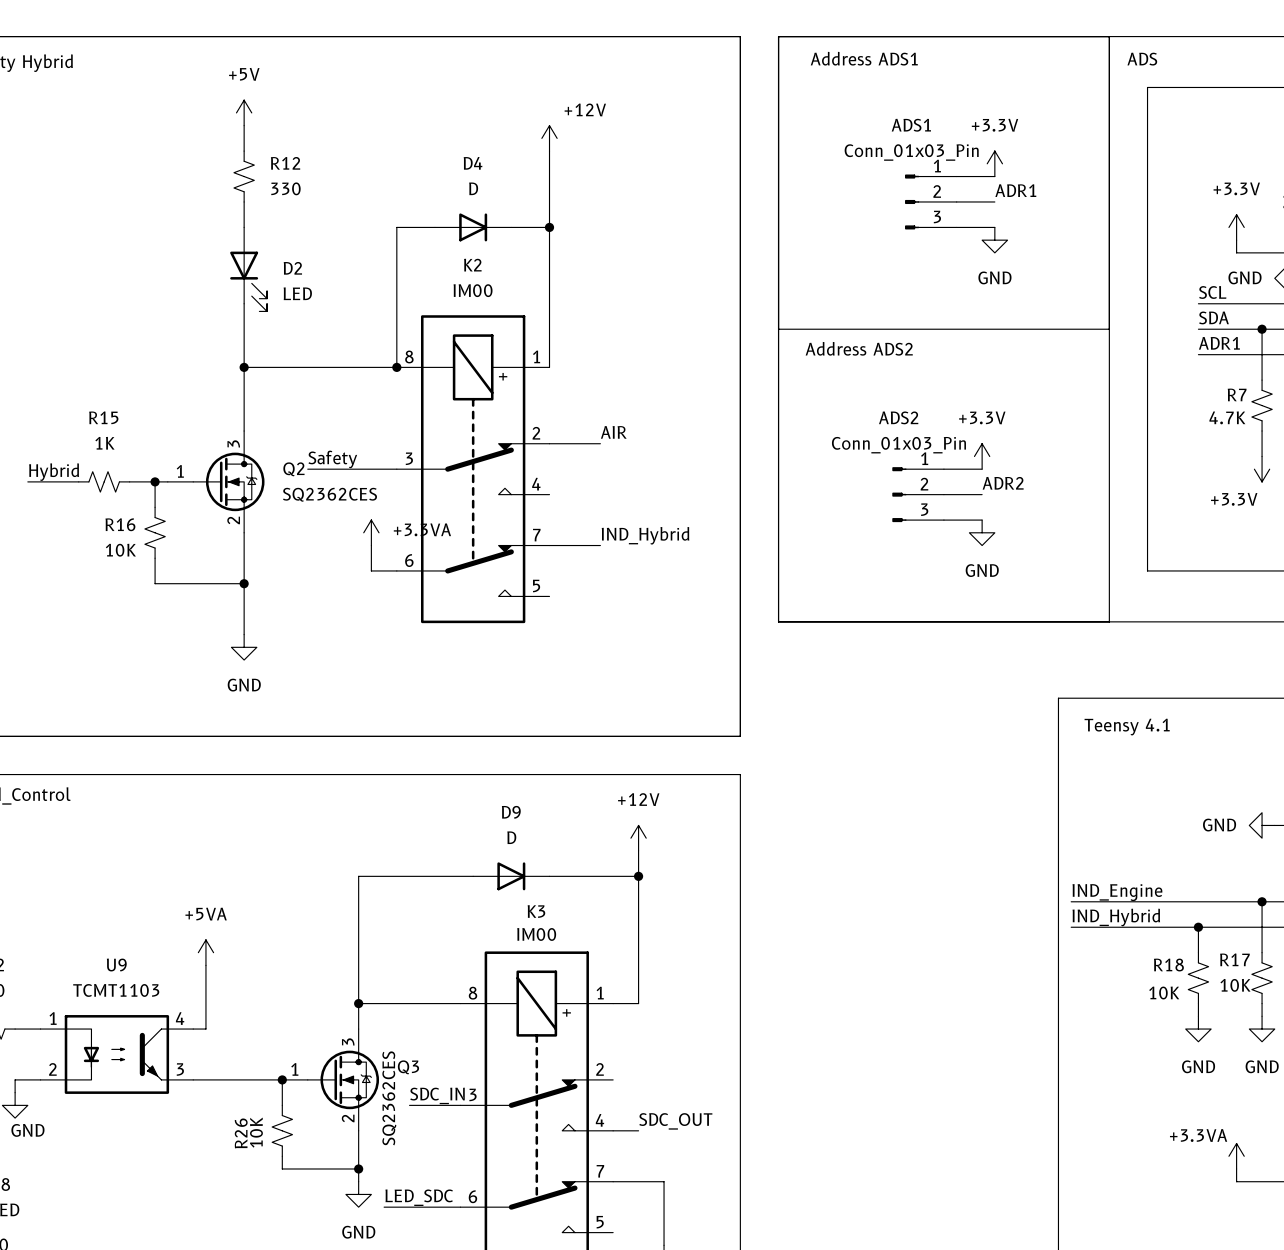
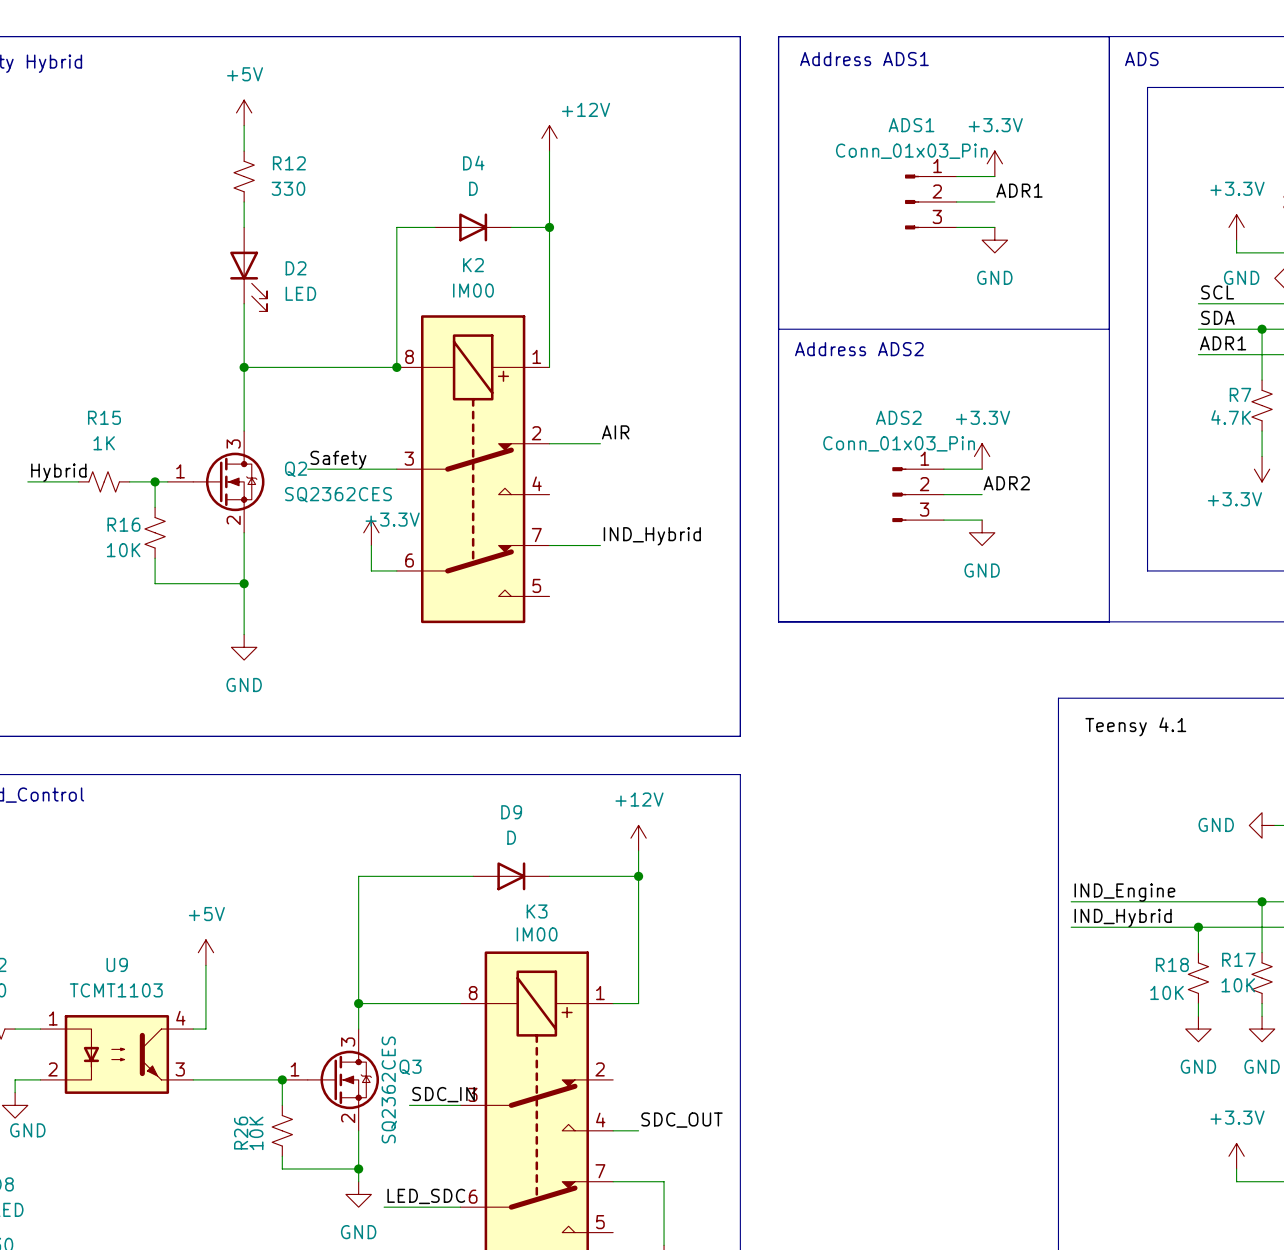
power symbol: +3.3VA (371, 532) -> +3.3V (371, 532)
power symbol: +5VA (205, 952) -> +5V (205, 952)
power symbol: +3.3VA (1236, 1156) -> +3.3V (1236, 1156)

